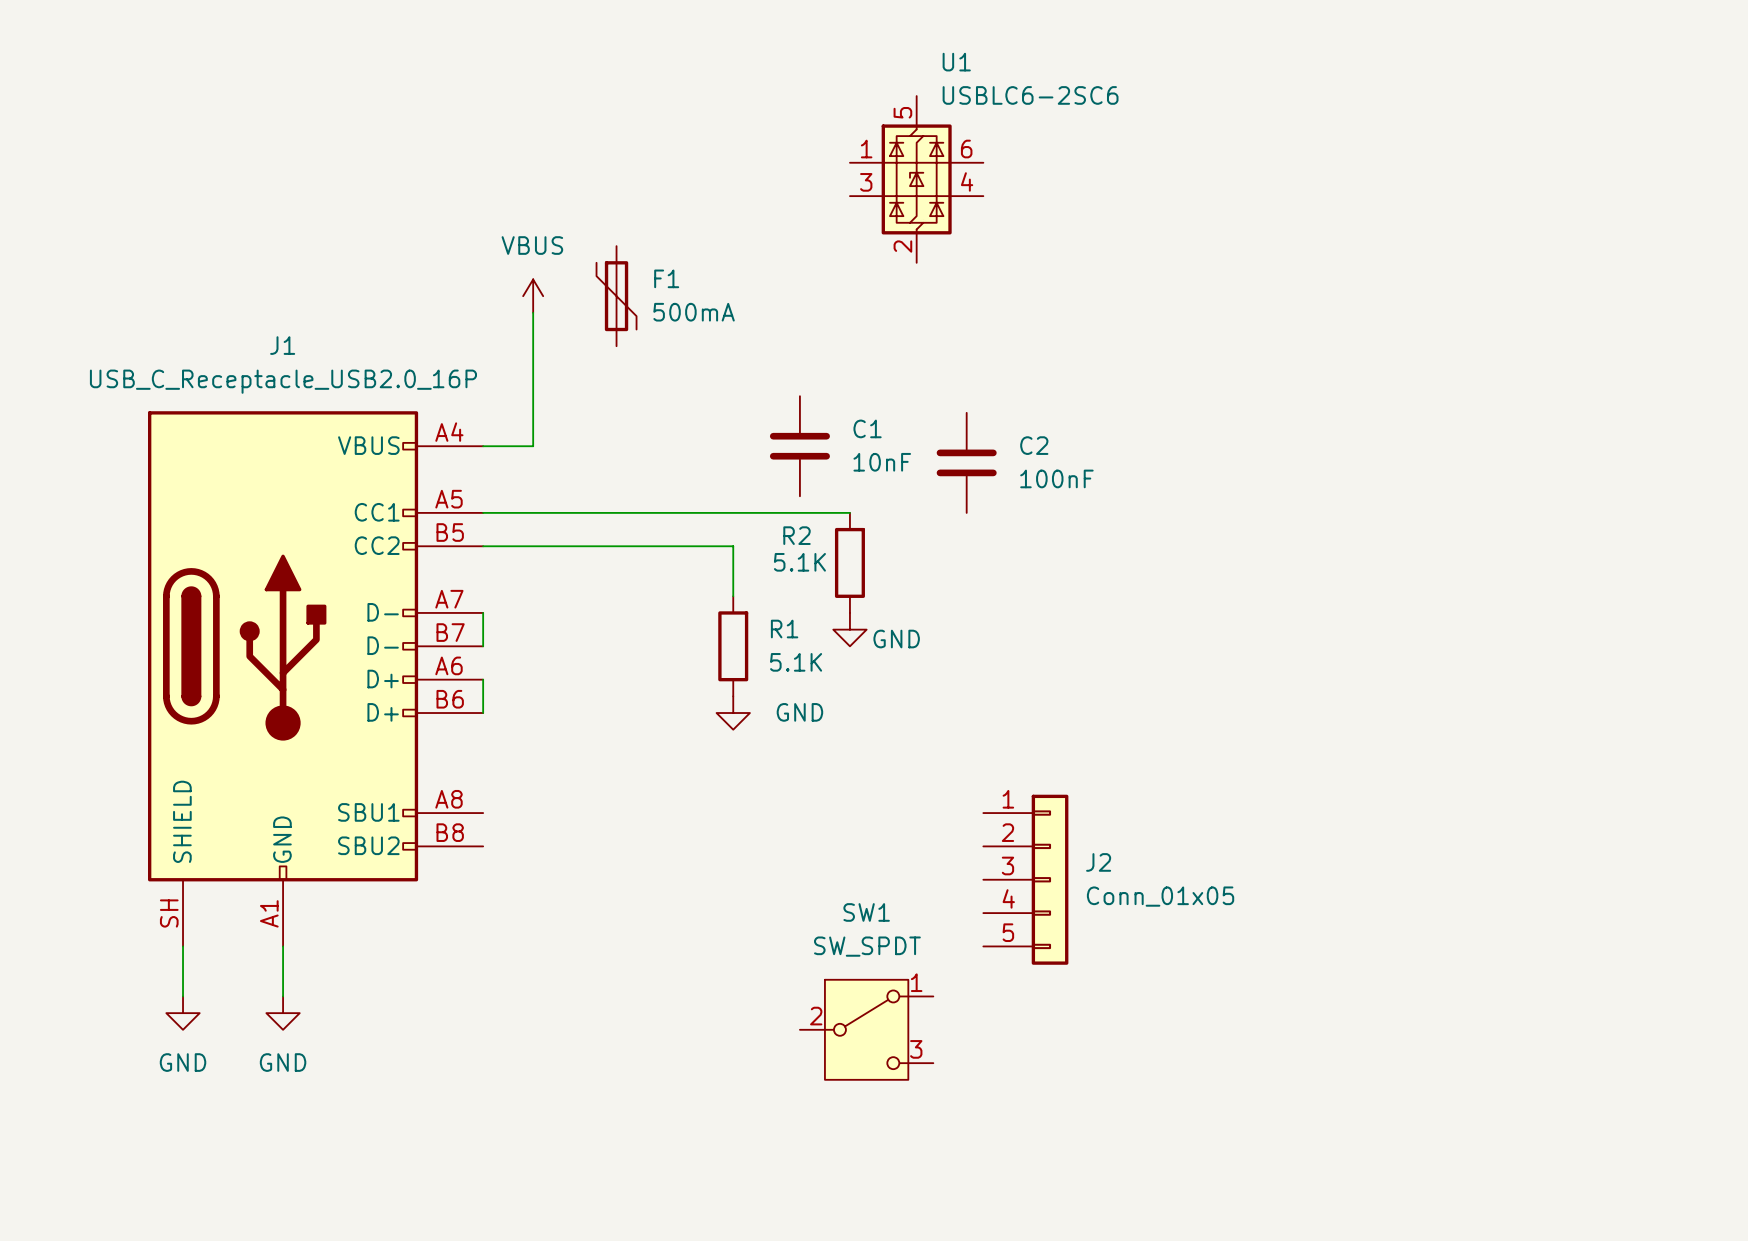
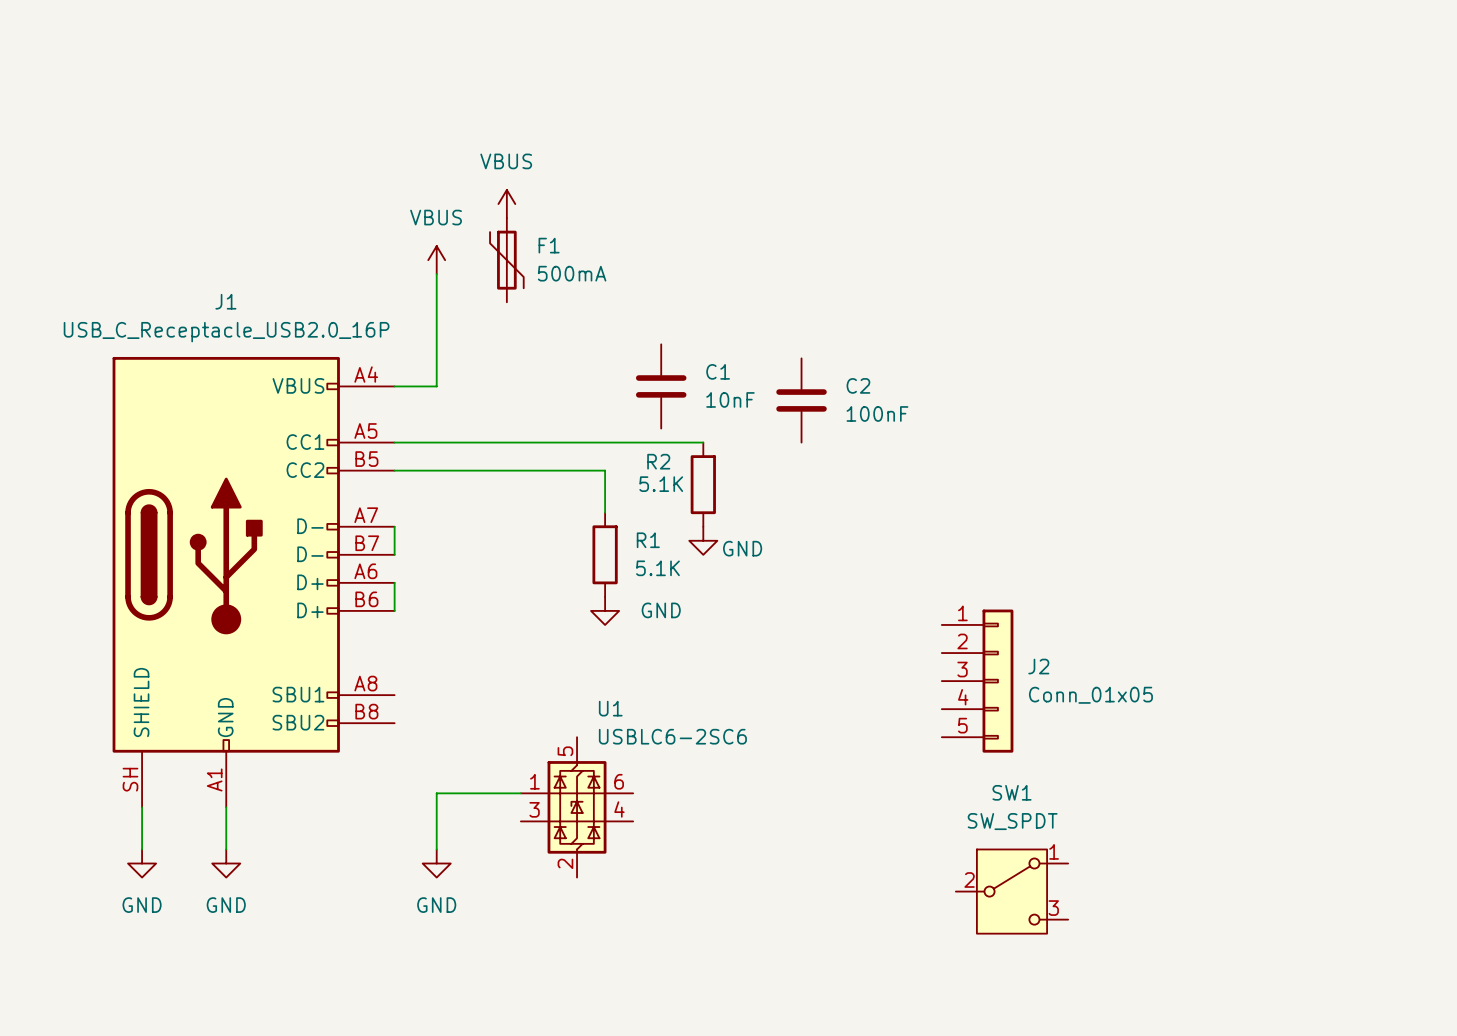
U1 position: (916, 179) -> (577, 807)
power symbol: none -> VBUS (506, 204)
J2 position: (1025, 879) -> (977, 681)
wire: none -> (520, 793) (436, 793) (436, 849)
power symbol: none -> GND (436, 863)
SW1 position: (866, 1029) -> (1011, 891)

